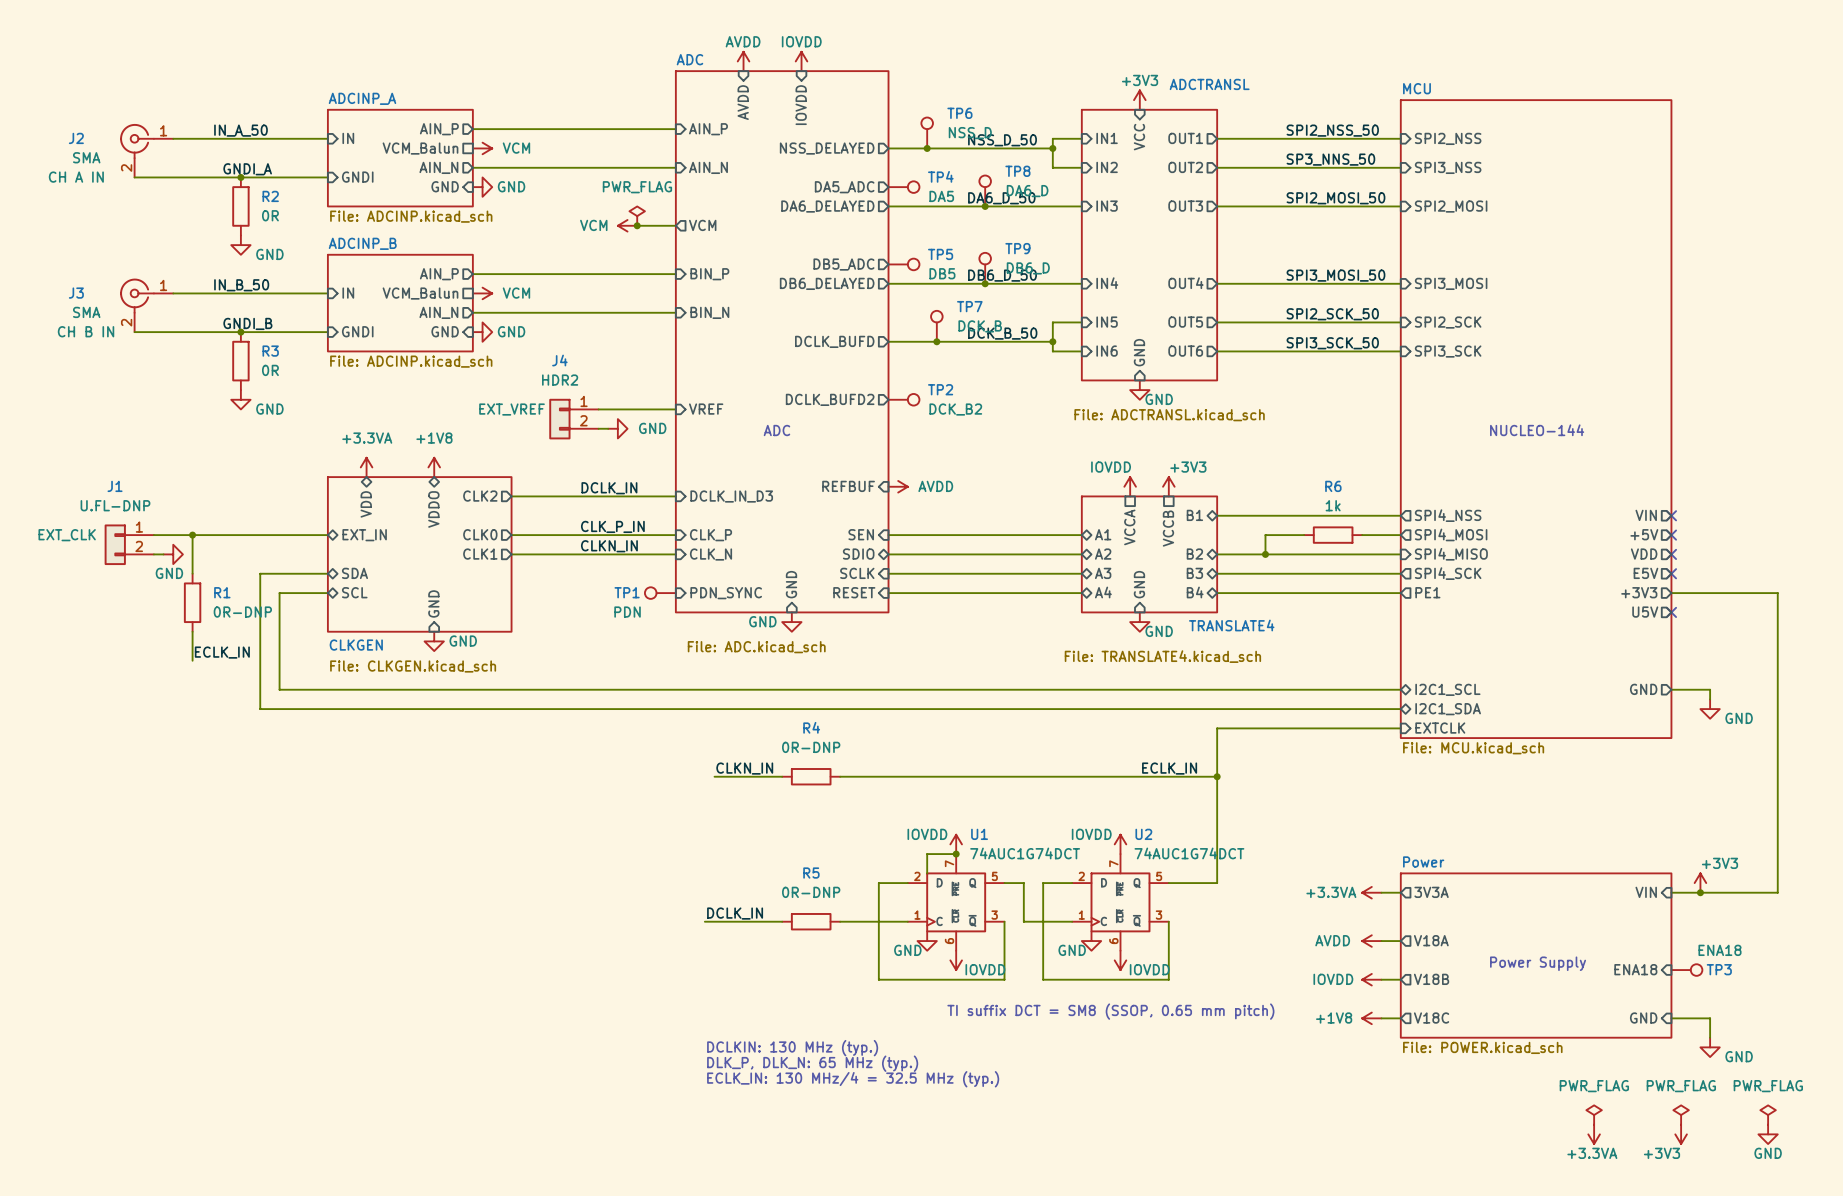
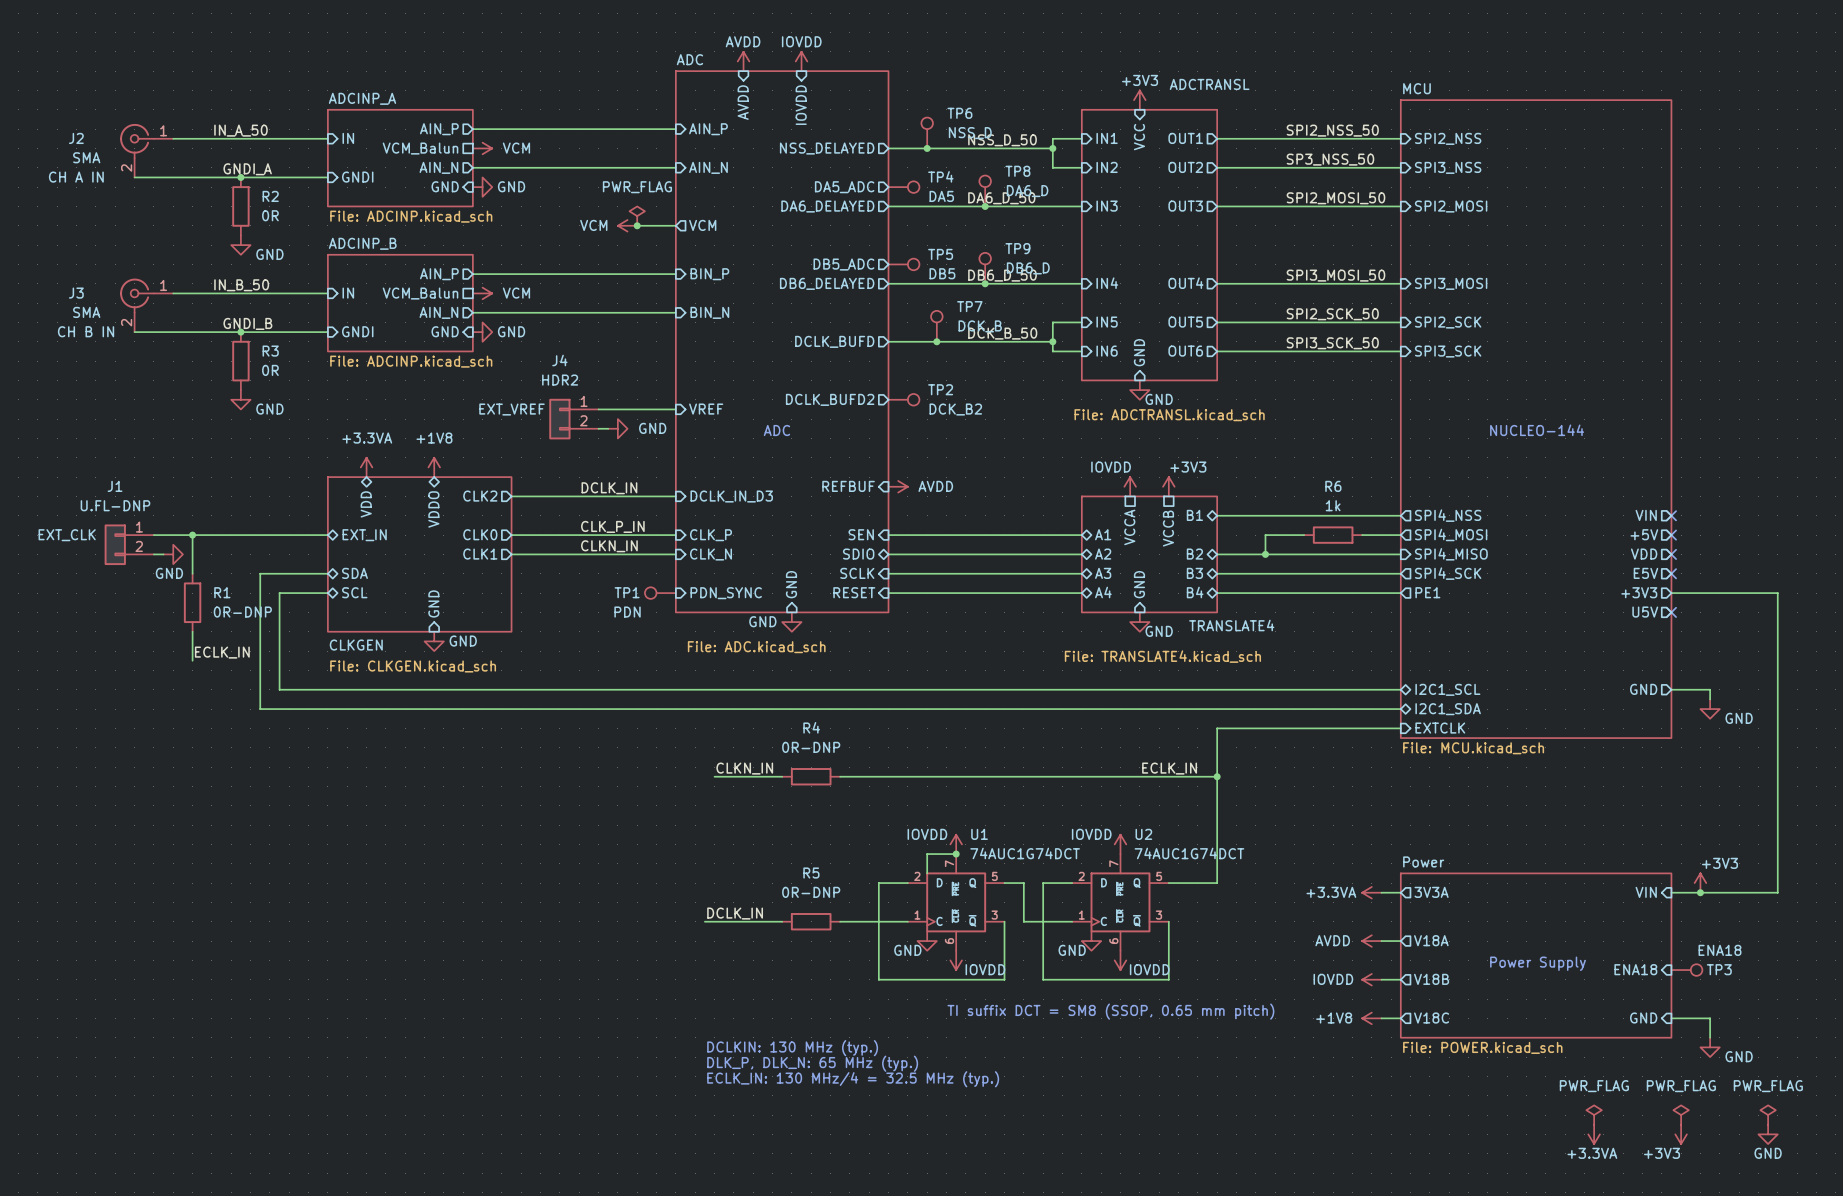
label: SP3_NNS_50 (1330, 159) -> SP3_NSS_50 (1330, 159)

